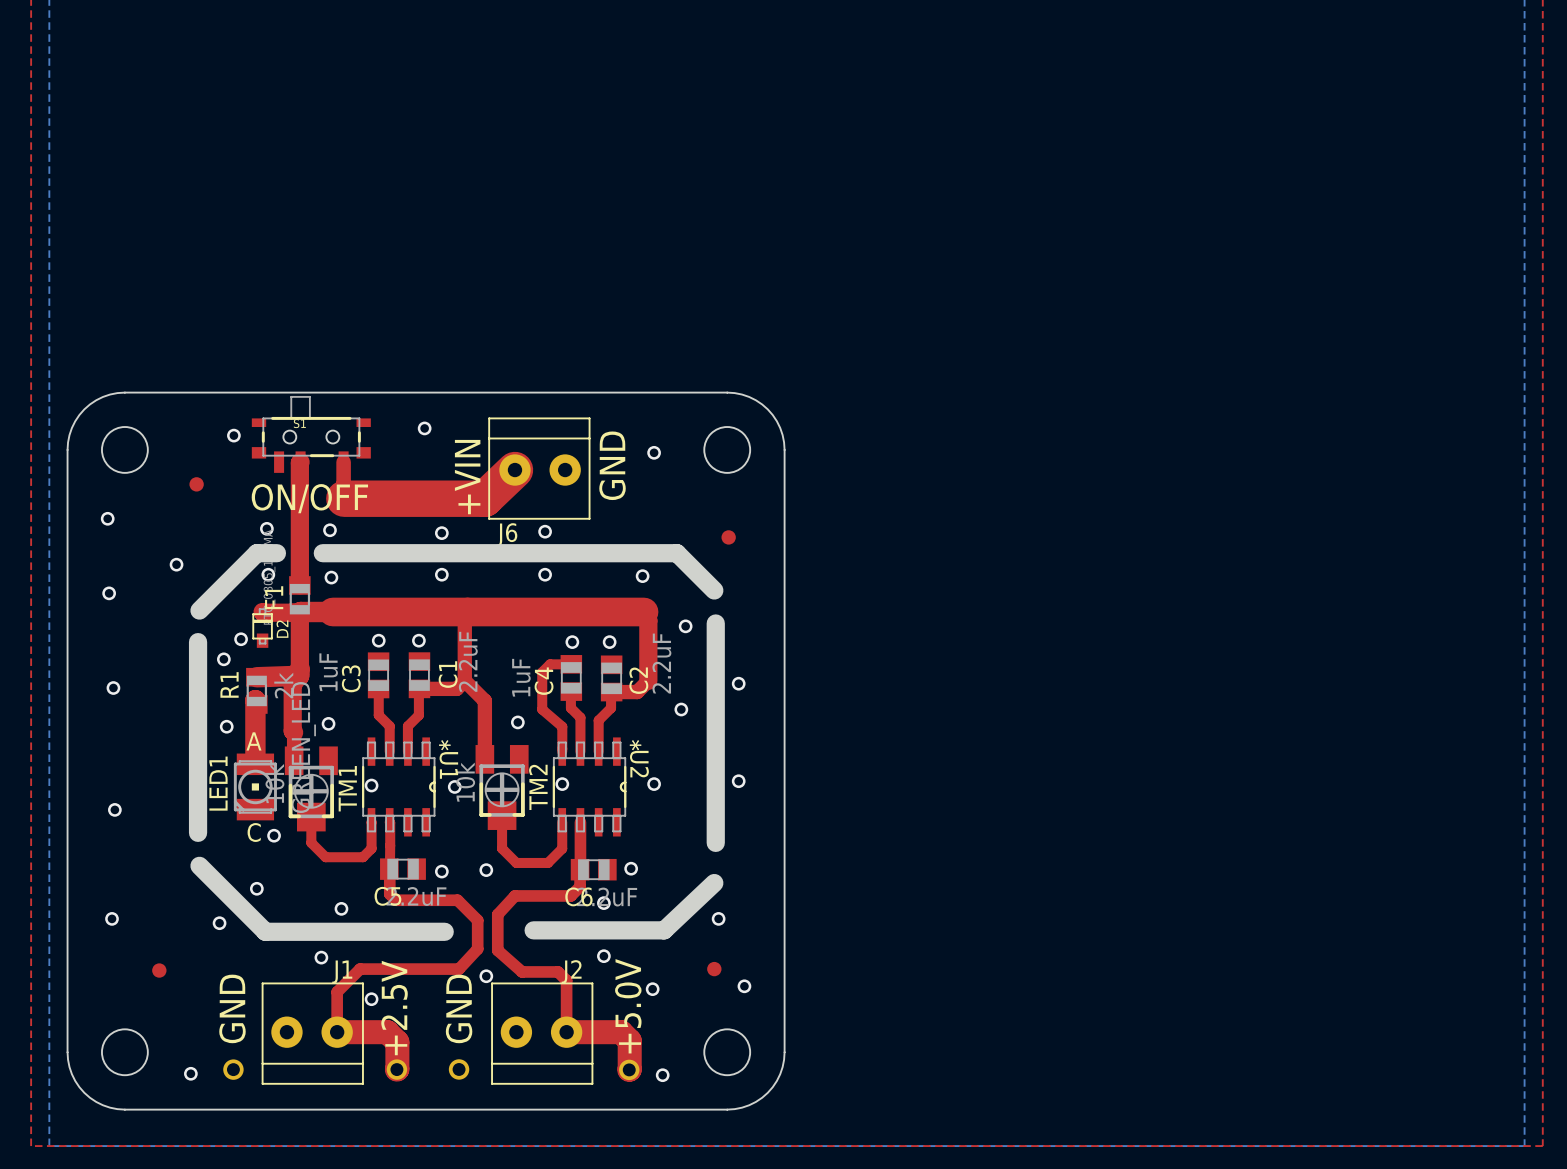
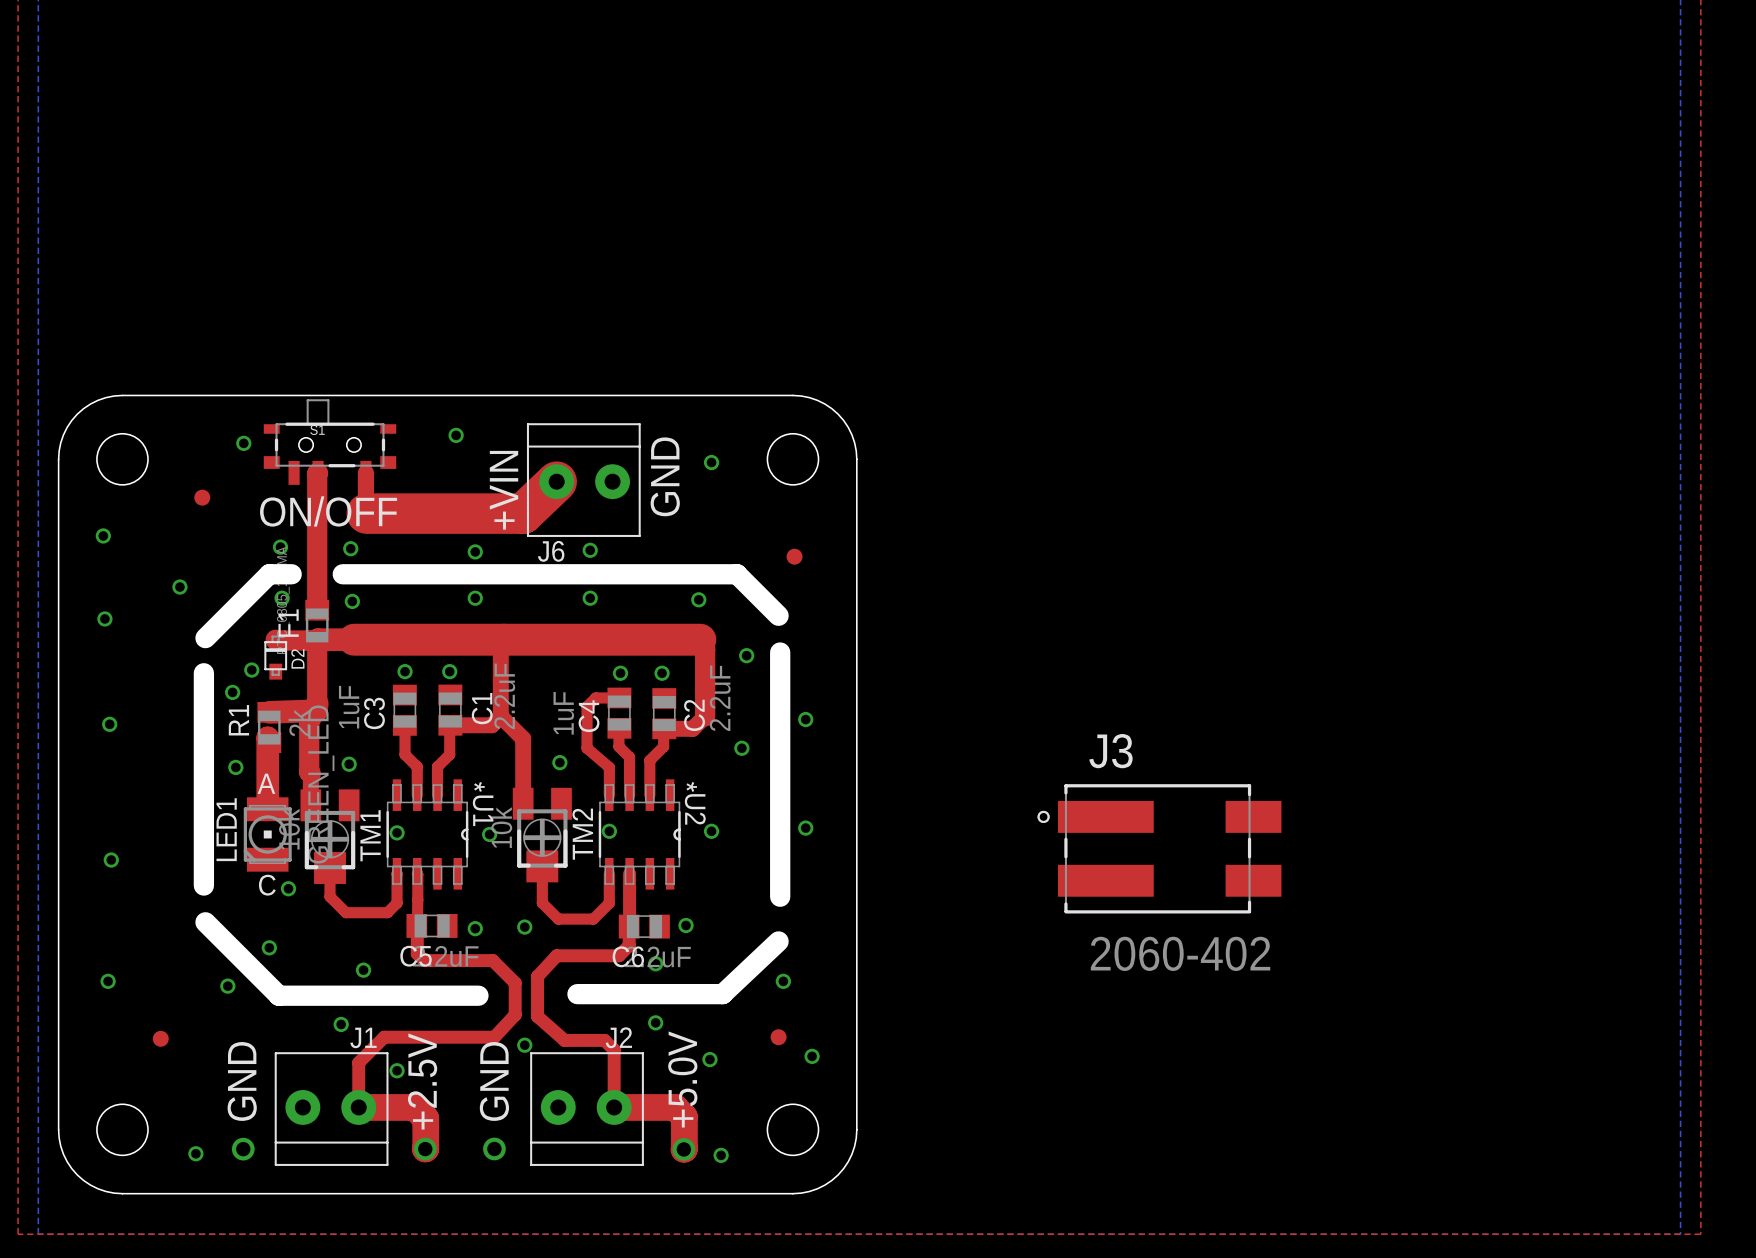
J3: none -> 2060-402 (1159, 848)

